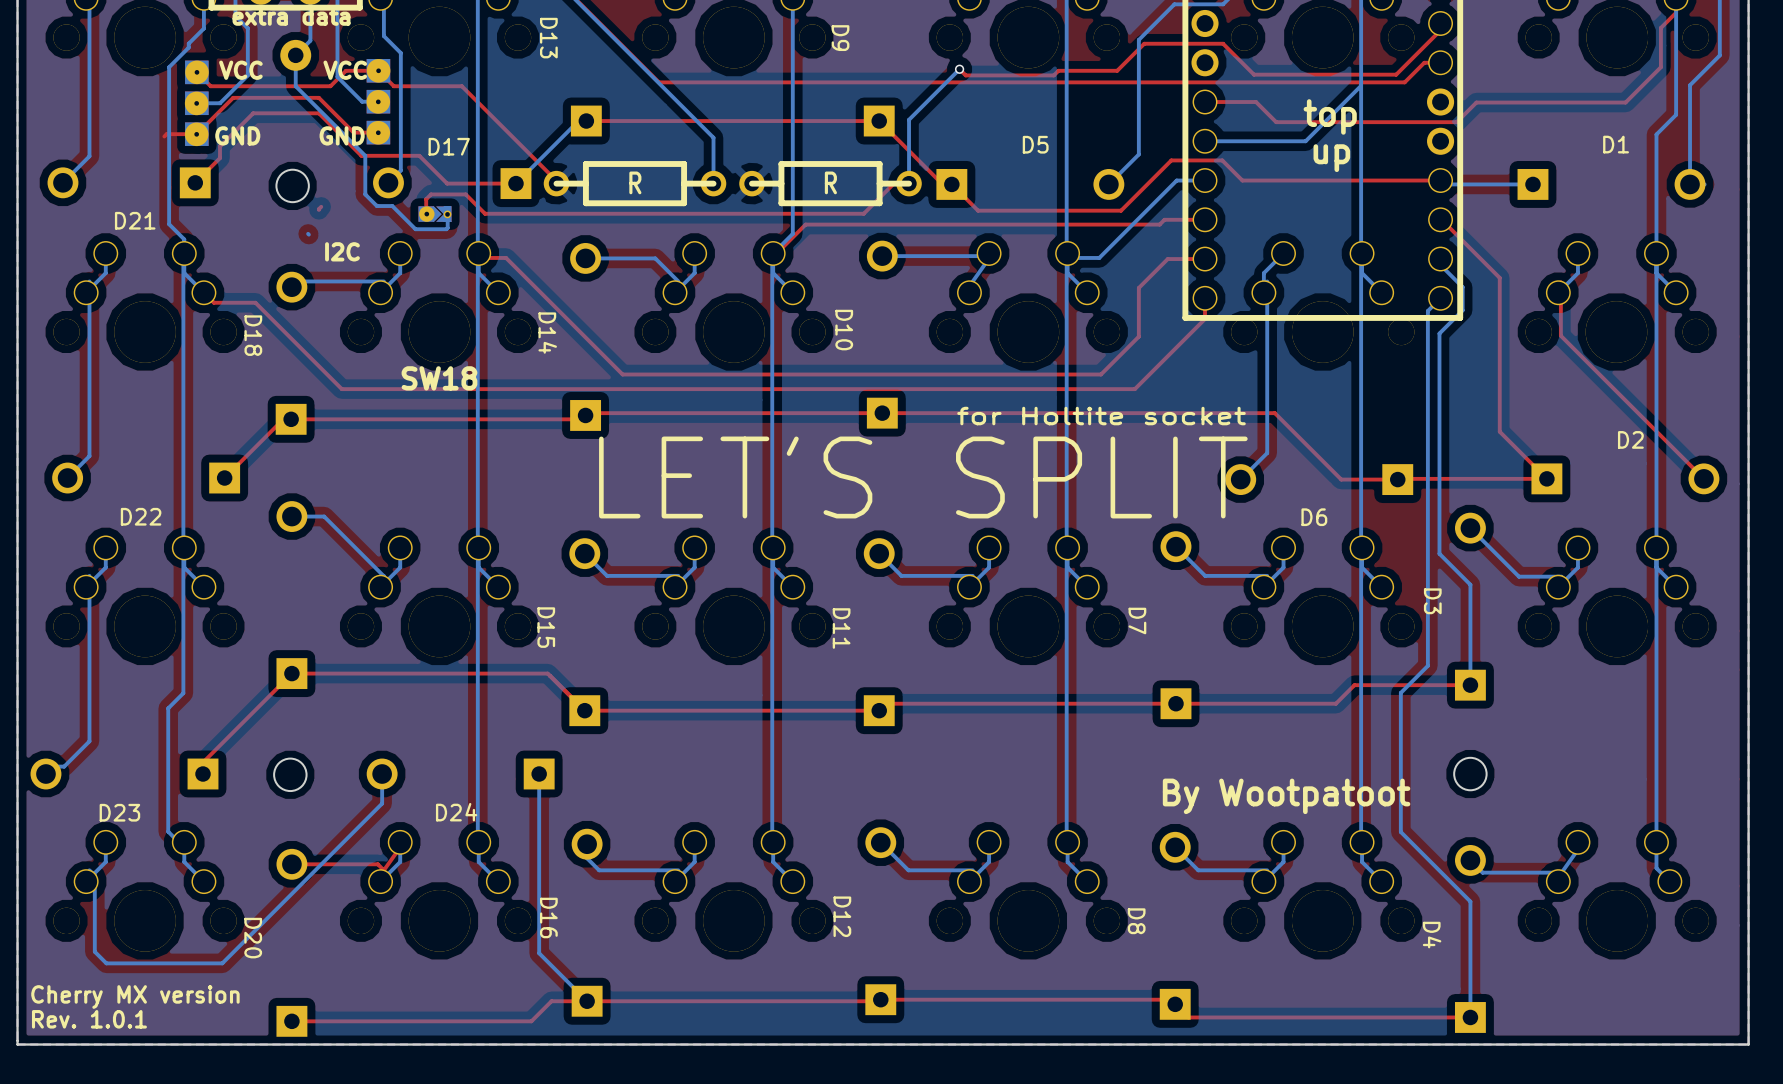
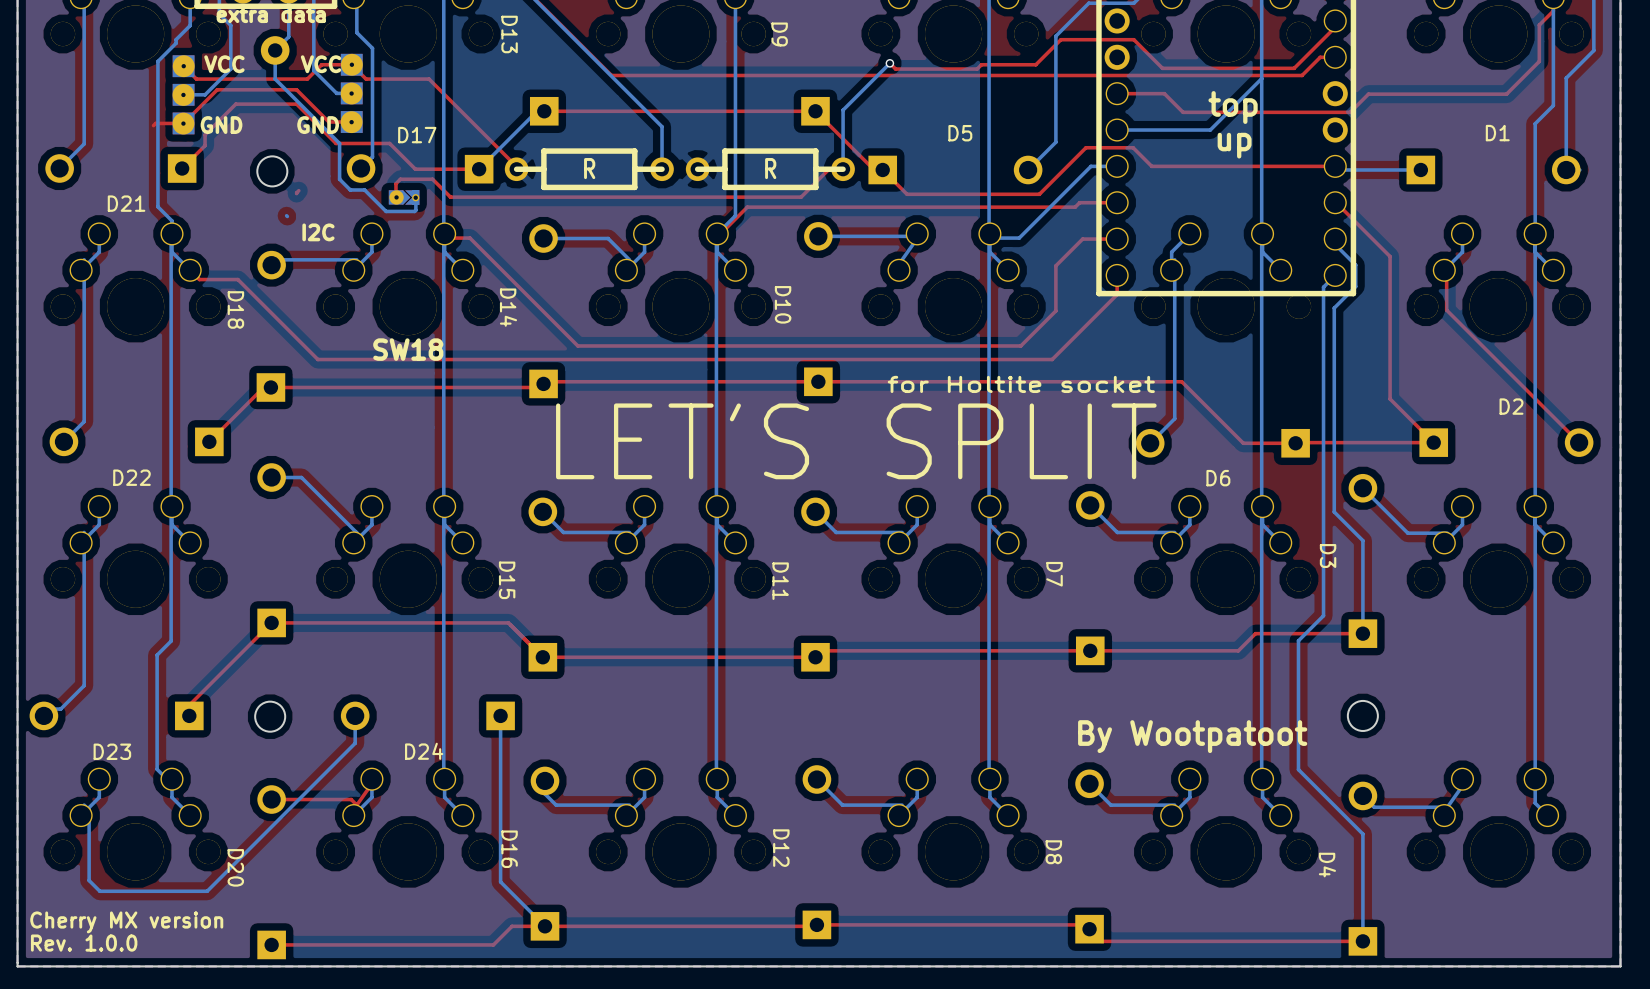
text: Rev. 1.0.1 (89, 1019) -> Rev. 1.0.0 (84, 943)

